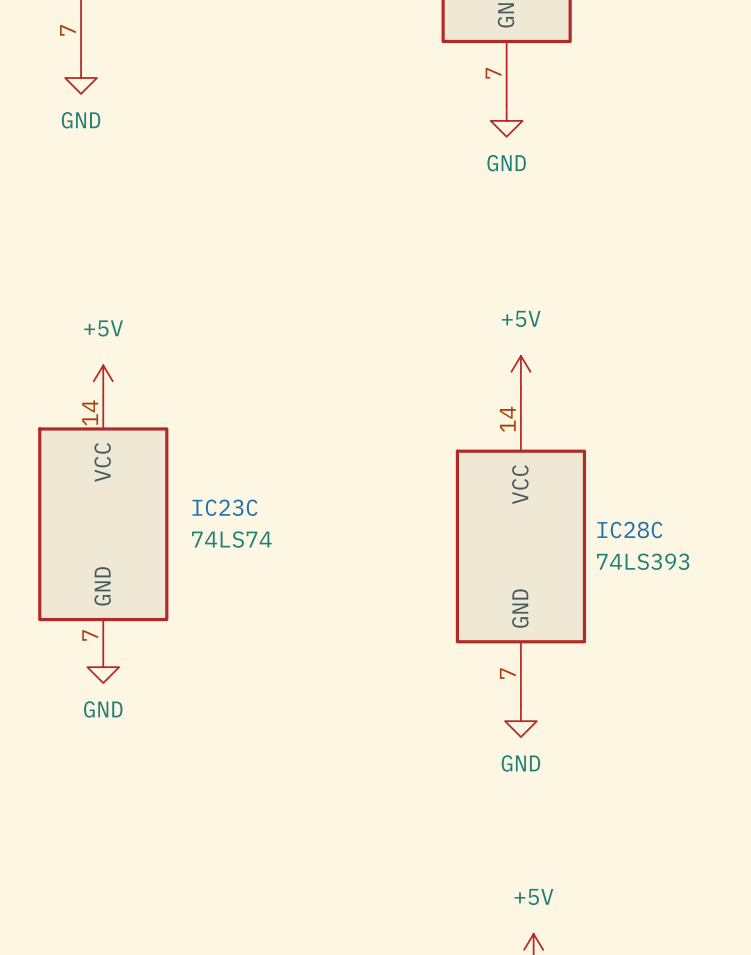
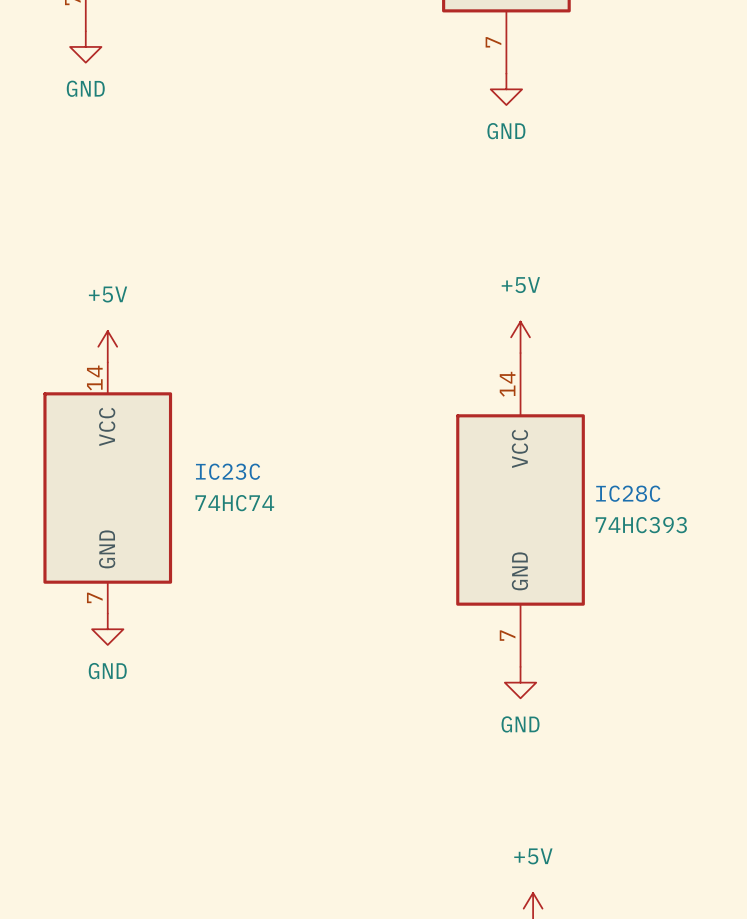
IC23C value: 74LS74 (231, 539) -> 74HC74 (234, 503)
IC28C value: 74LS393 (643, 561) -> 74HC393 (641, 525)

